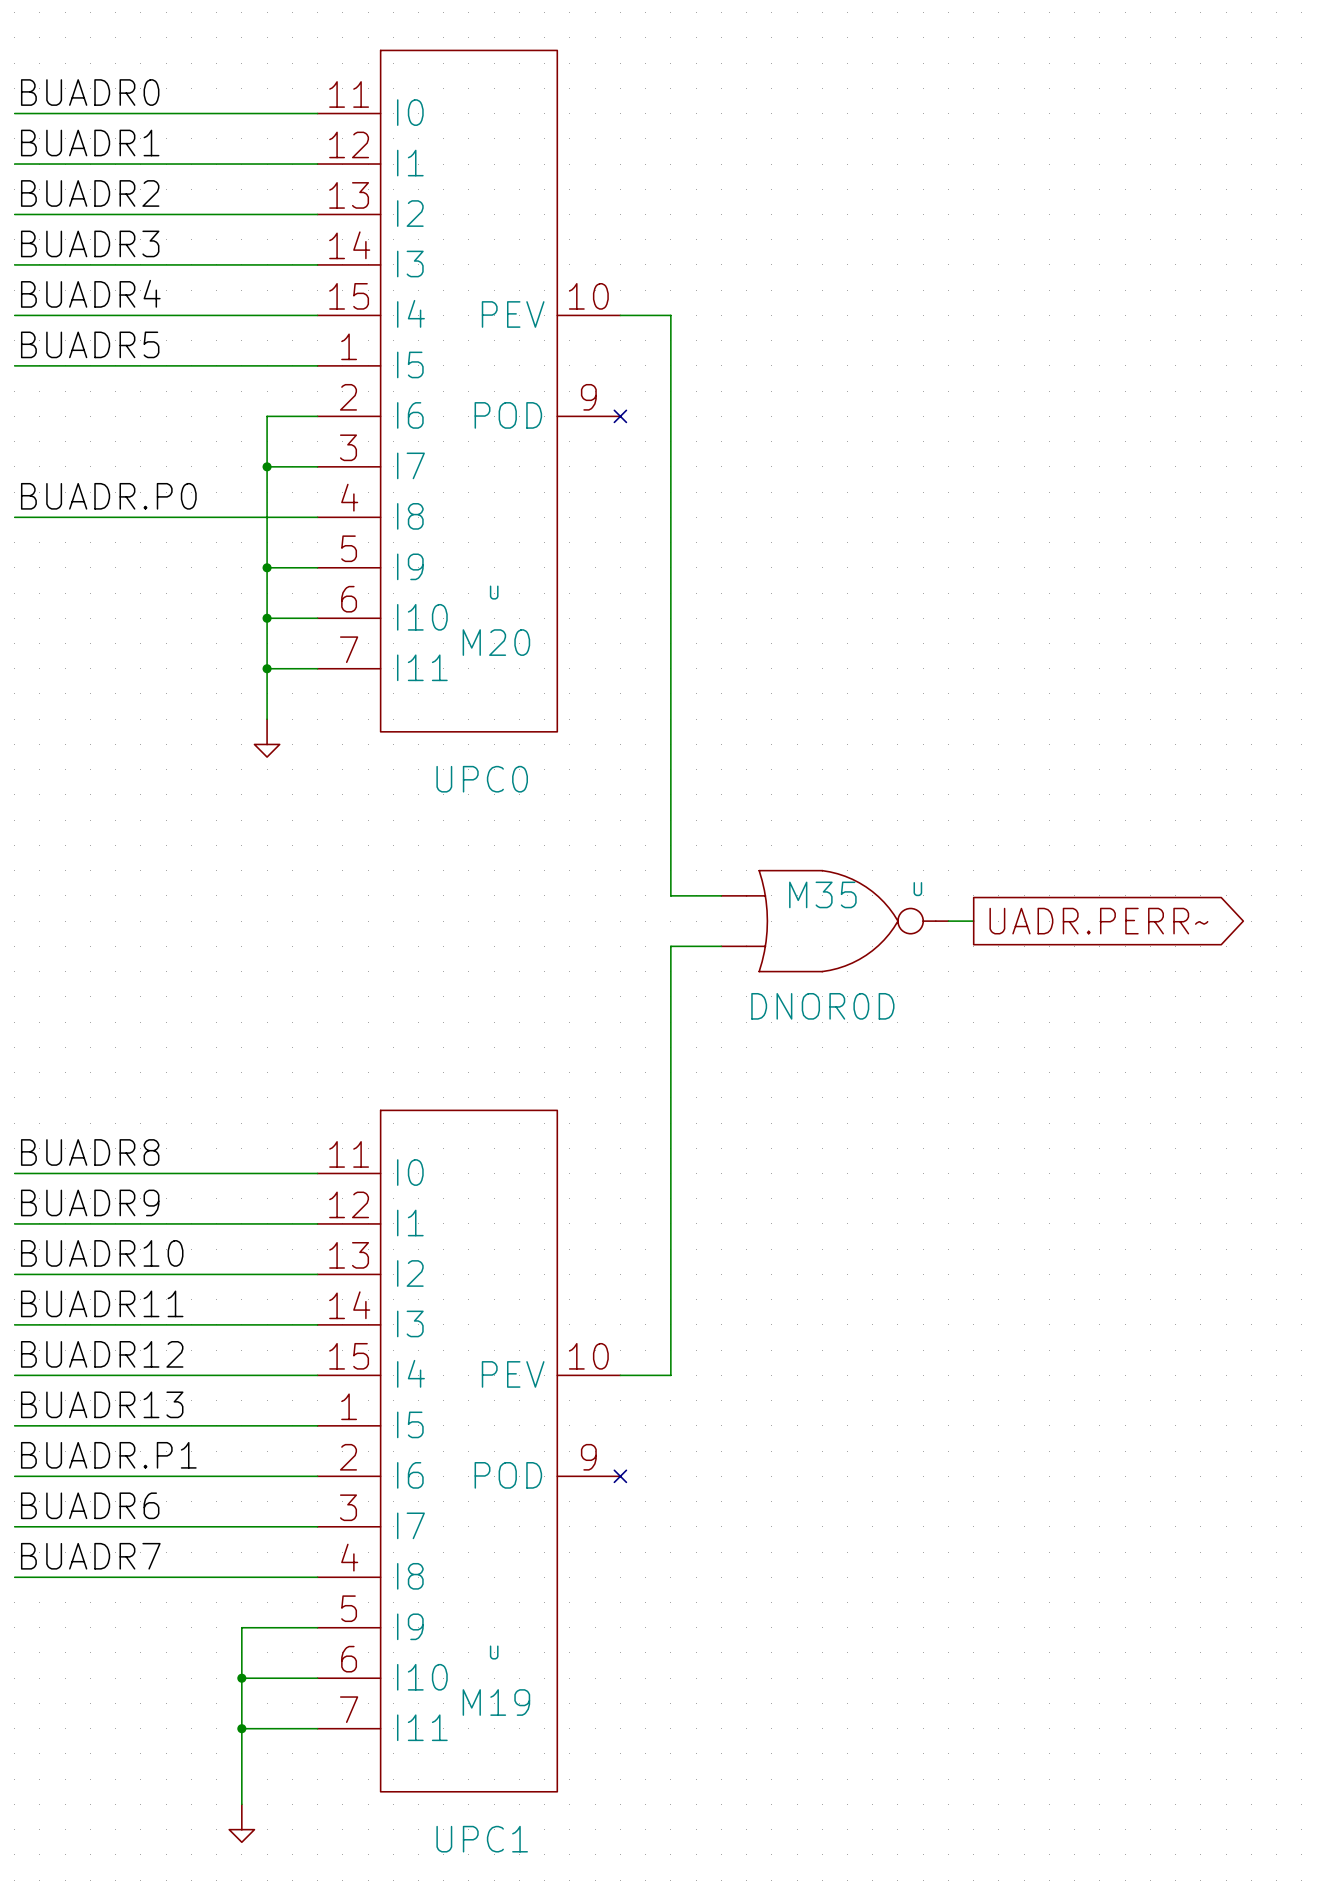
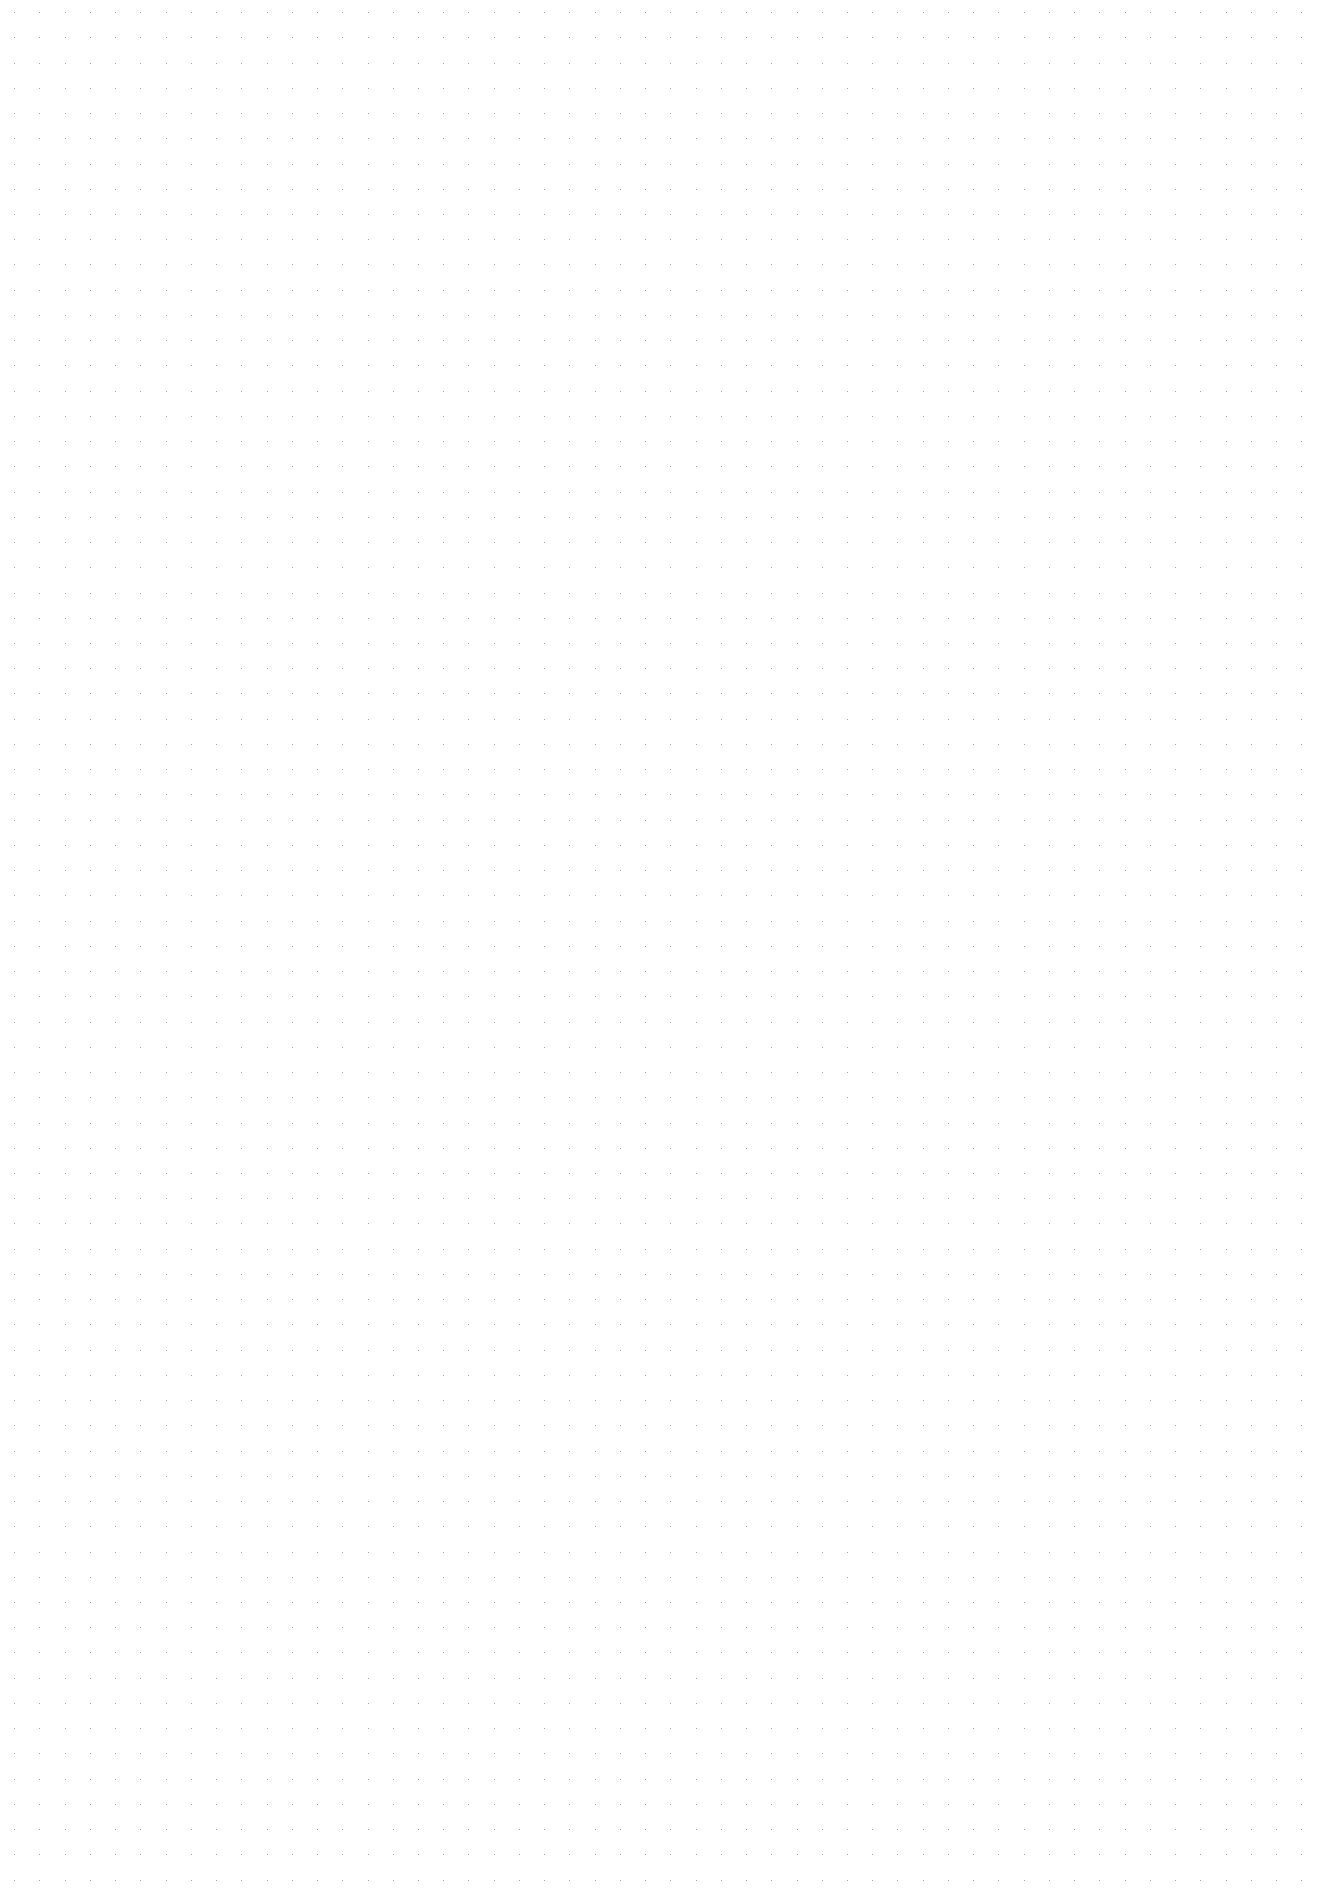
label: BUADR0 (90, 92) -> none
wire: (14, 113) (317, 113) -> none
label: BUADR1 (90, 143) -> none
wire: (14, 164) (317, 164) -> none
label: BUADR2 (90, 193) -> none
wire: (14, 214) (317, 214) -> none
label: BUADR3 (90, 243) -> none
wire: (14, 264) (317, 264) -> none
label: BUADR4 (90, 293) -> none
wire: (14, 315) (317, 315) -> none
wire: (620, 315) (670, 315) (670, 895) (721, 895) -> none
label: BUADR5 (90, 344) -> none
wire: (14, 365) (317, 365) -> none
U: (468, 391) -> none
wire: (317, 416) (267, 416) (267, 719) -> none
no-connect mark: (620, 416) -> none
wire: (267, 466) (317, 466) -> none
junction: (267, 466) -> none
label: BUADR.P0 (108, 496) -> none
wire: (14, 517) (317, 517) -> none
wire: (267, 567) (317, 567) -> none
junction: (267, 567) -> none
wire: (267, 618) (317, 618) -> none
junction: (267, 618) -> none
wire: (267, 668) (317, 668) -> none
junction: (267, 668) -> none
power symbol: (267, 738) -> none
U: (834, 921) -> none
wire: (948, 921) (973, 921) -> none
global label: UADR.PERR~ (1098, 921) -> none
wire: (721, 946) (670, 946) (670, 1375) (620, 1375) -> none
label: BUADR8 (90, 1152) -> none
wire: (14, 1173) (317, 1173) -> none
label: BUADR9 (90, 1202) -> none
wire: (14, 1223) (317, 1223) -> none
label: BUADR10 (102, 1253) -> none
wire: (14, 1274) (317, 1274) -> none
label: BUADR11 (102, 1303) -> none
wire: (14, 1324) (317, 1324) -> none
label: BUADR12 (102, 1354) -> none
wire: (14, 1375) (317, 1375) -> none
label: BUADR13 (102, 1404) -> none
wire: (14, 1425) (317, 1425) -> none
U: (468, 1451) -> none
label: BUADR.P1 (108, 1455) -> none
wire: (14, 1476) (317, 1476) -> none
no-connect mark: (620, 1476) -> none
label: BUADR6 (90, 1505) -> none
wire: (14, 1526) (317, 1526) -> none
label: BUADR7 (90, 1556) -> none
wire: (14, 1577) (317, 1577) -> none
wire: (317, 1627) (241, 1627) (241, 1804) -> none
wire: (241, 1678) (317, 1678) -> none
junction: (241, 1678) -> none
wire: (241, 1728) (317, 1728) -> none
junction: (241, 1728) -> none
power symbol: (241, 1823) -> none

